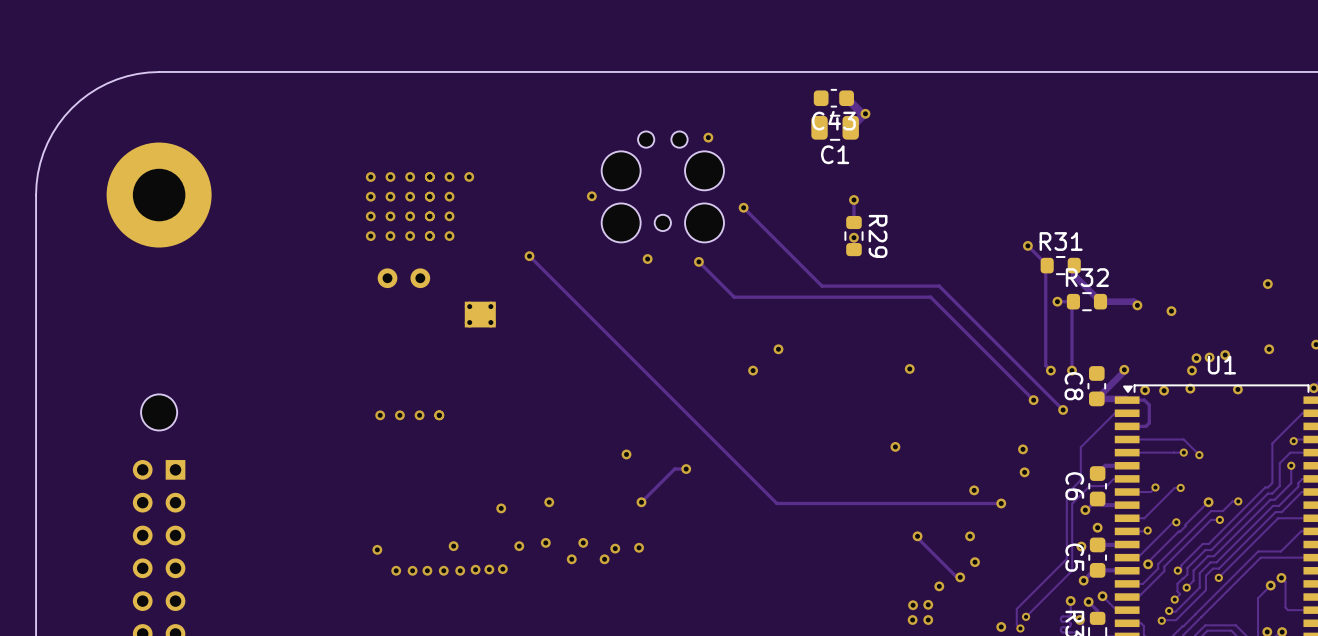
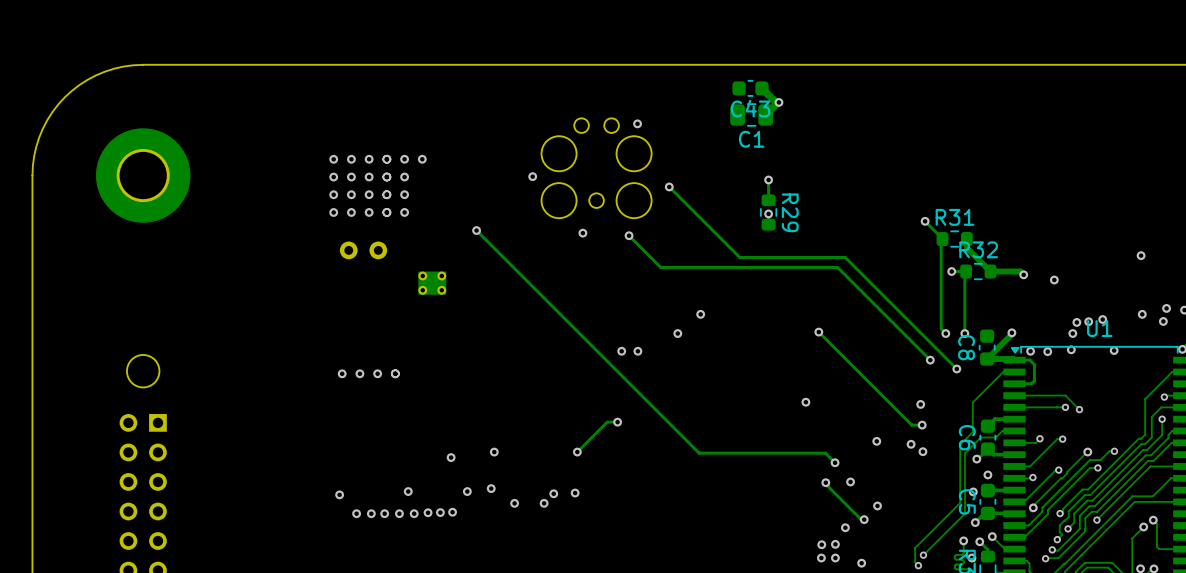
via: none -> (1166, 308)
via: none -> (1163, 321)
track: none -> (818, 332) (911, 425) (917, 425)
via: none -> (621, 351)
via: none -> (637, 351)
via: (626, 454) -> none
via: none -> (911, 444)
via: none -> (922, 451)
track: (1001, 503) (917, 503) -> (835, 462) (825, 453)
via: (1001, 503) -> none
via: none -> (835, 462)
via: none -> (850, 481)
via: (970, 536) -> none
via: (583, 542) -> none
via position: (1001, 626) -> (861, 563)

